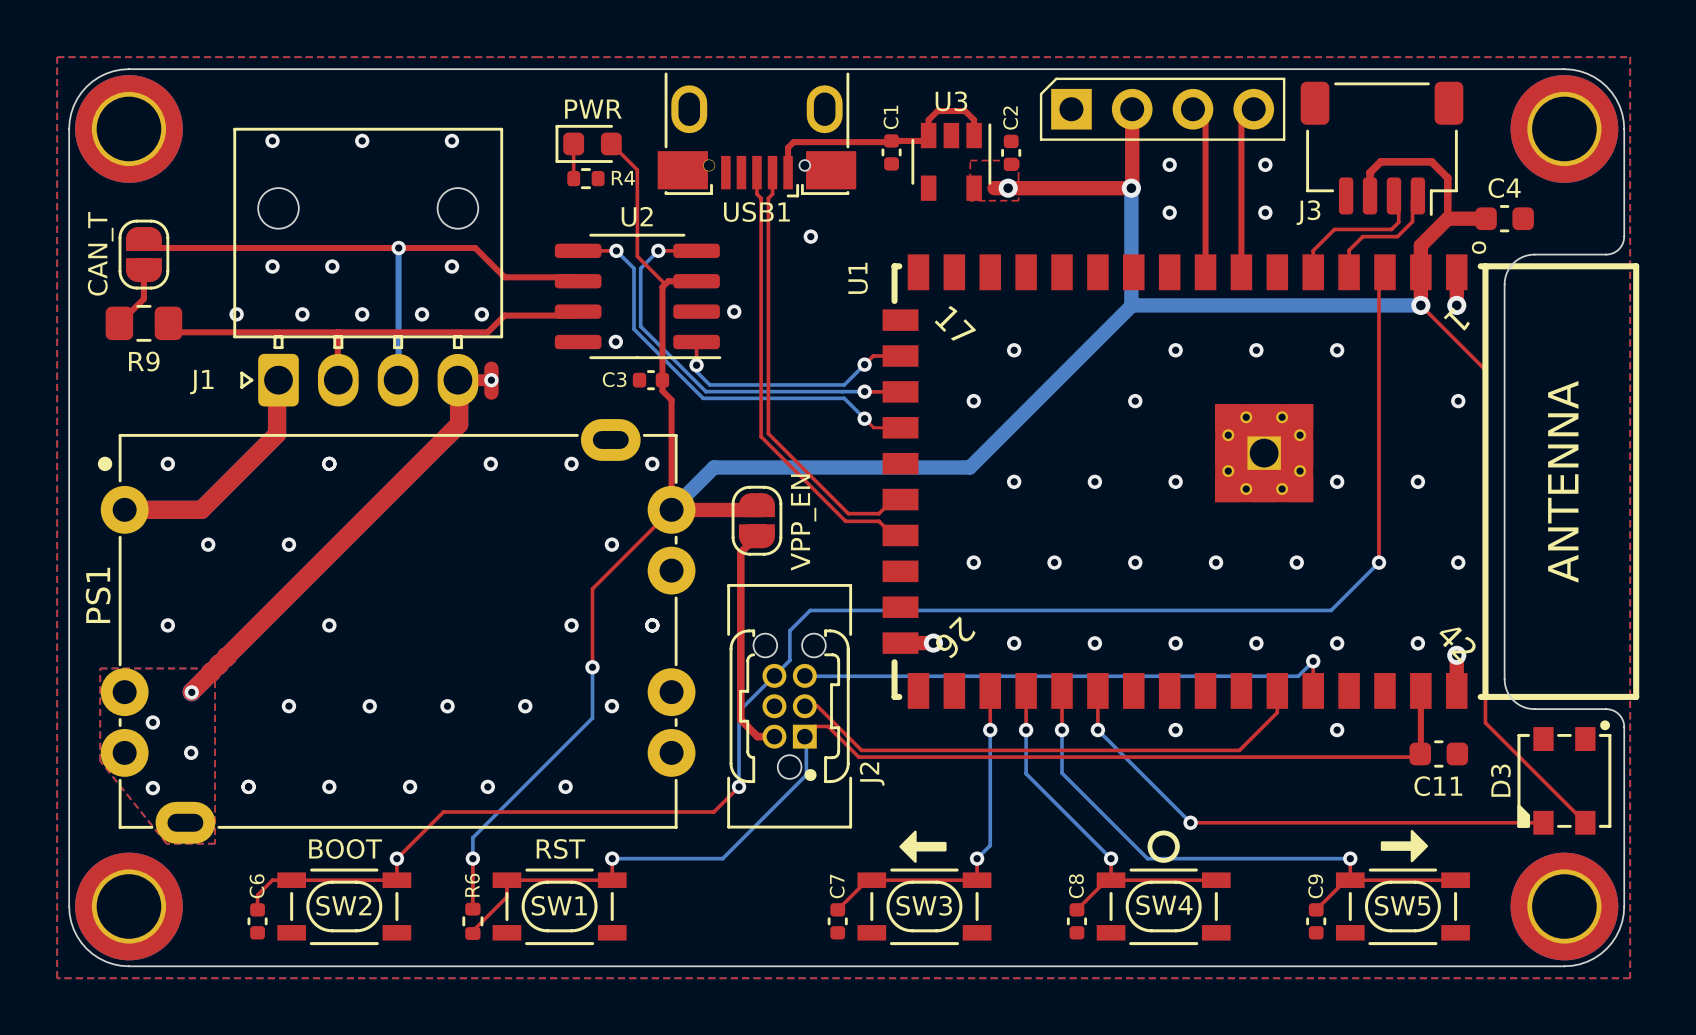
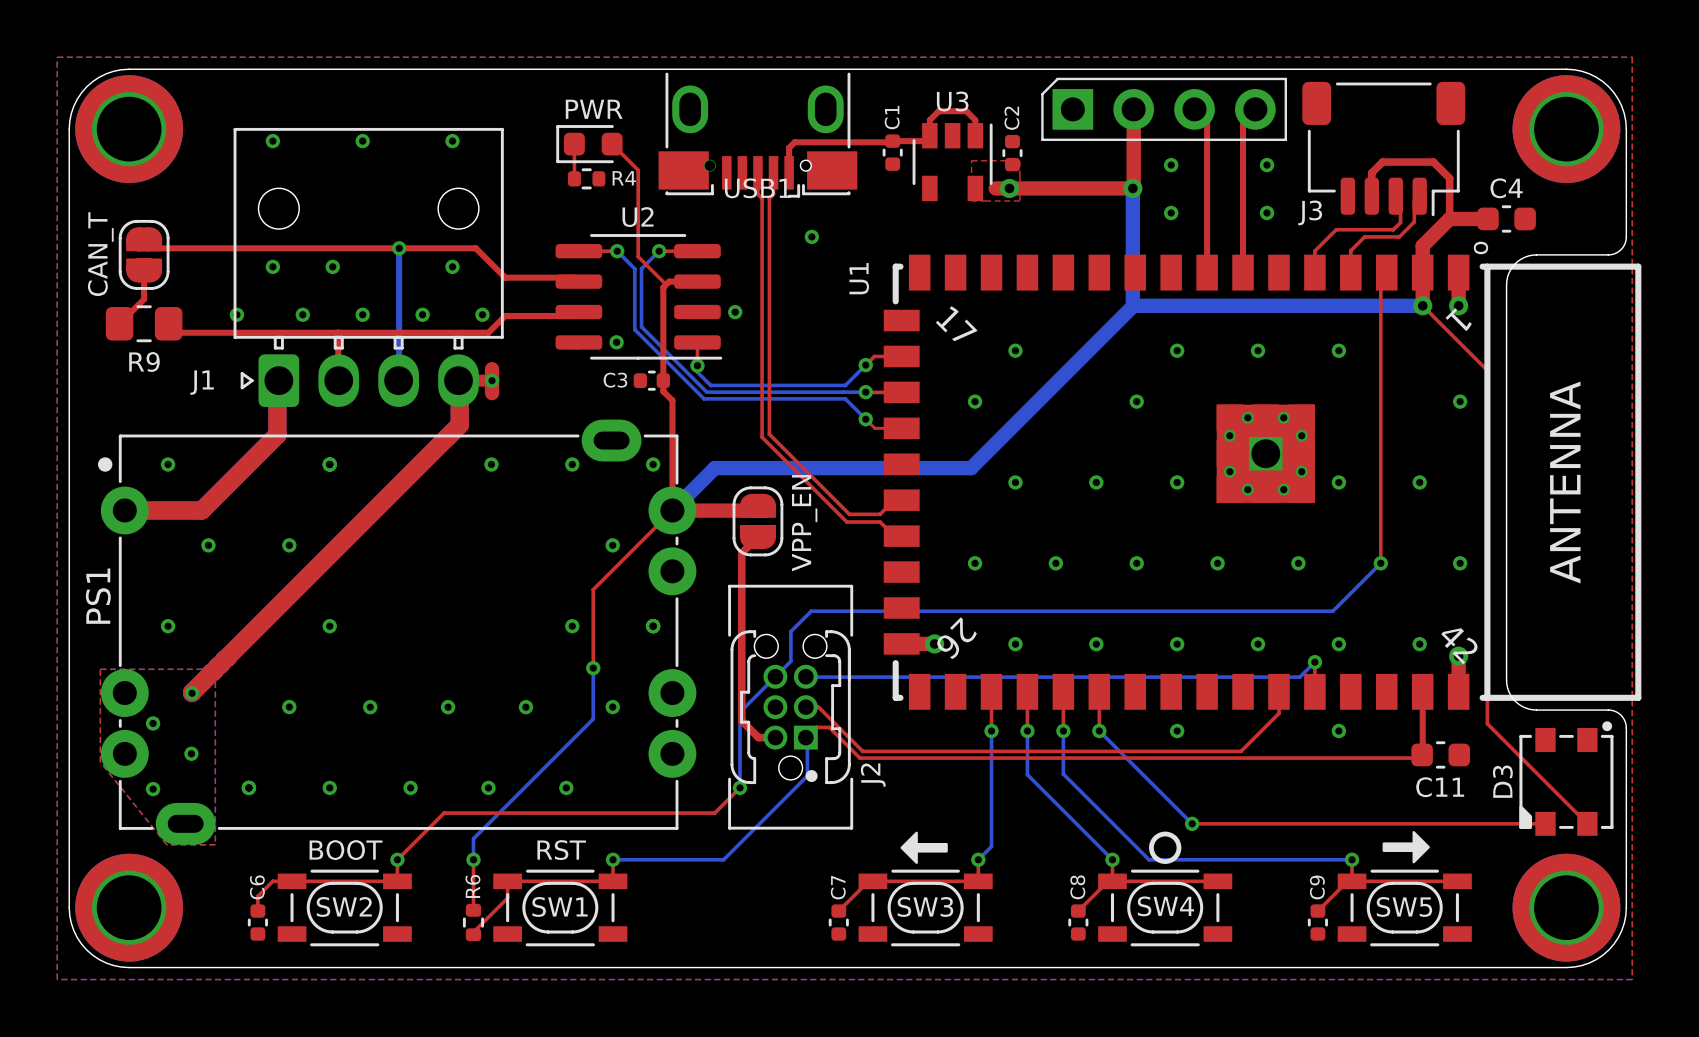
USB1 name position: USB1 (756, 212) -> USB1 (757, 188)

